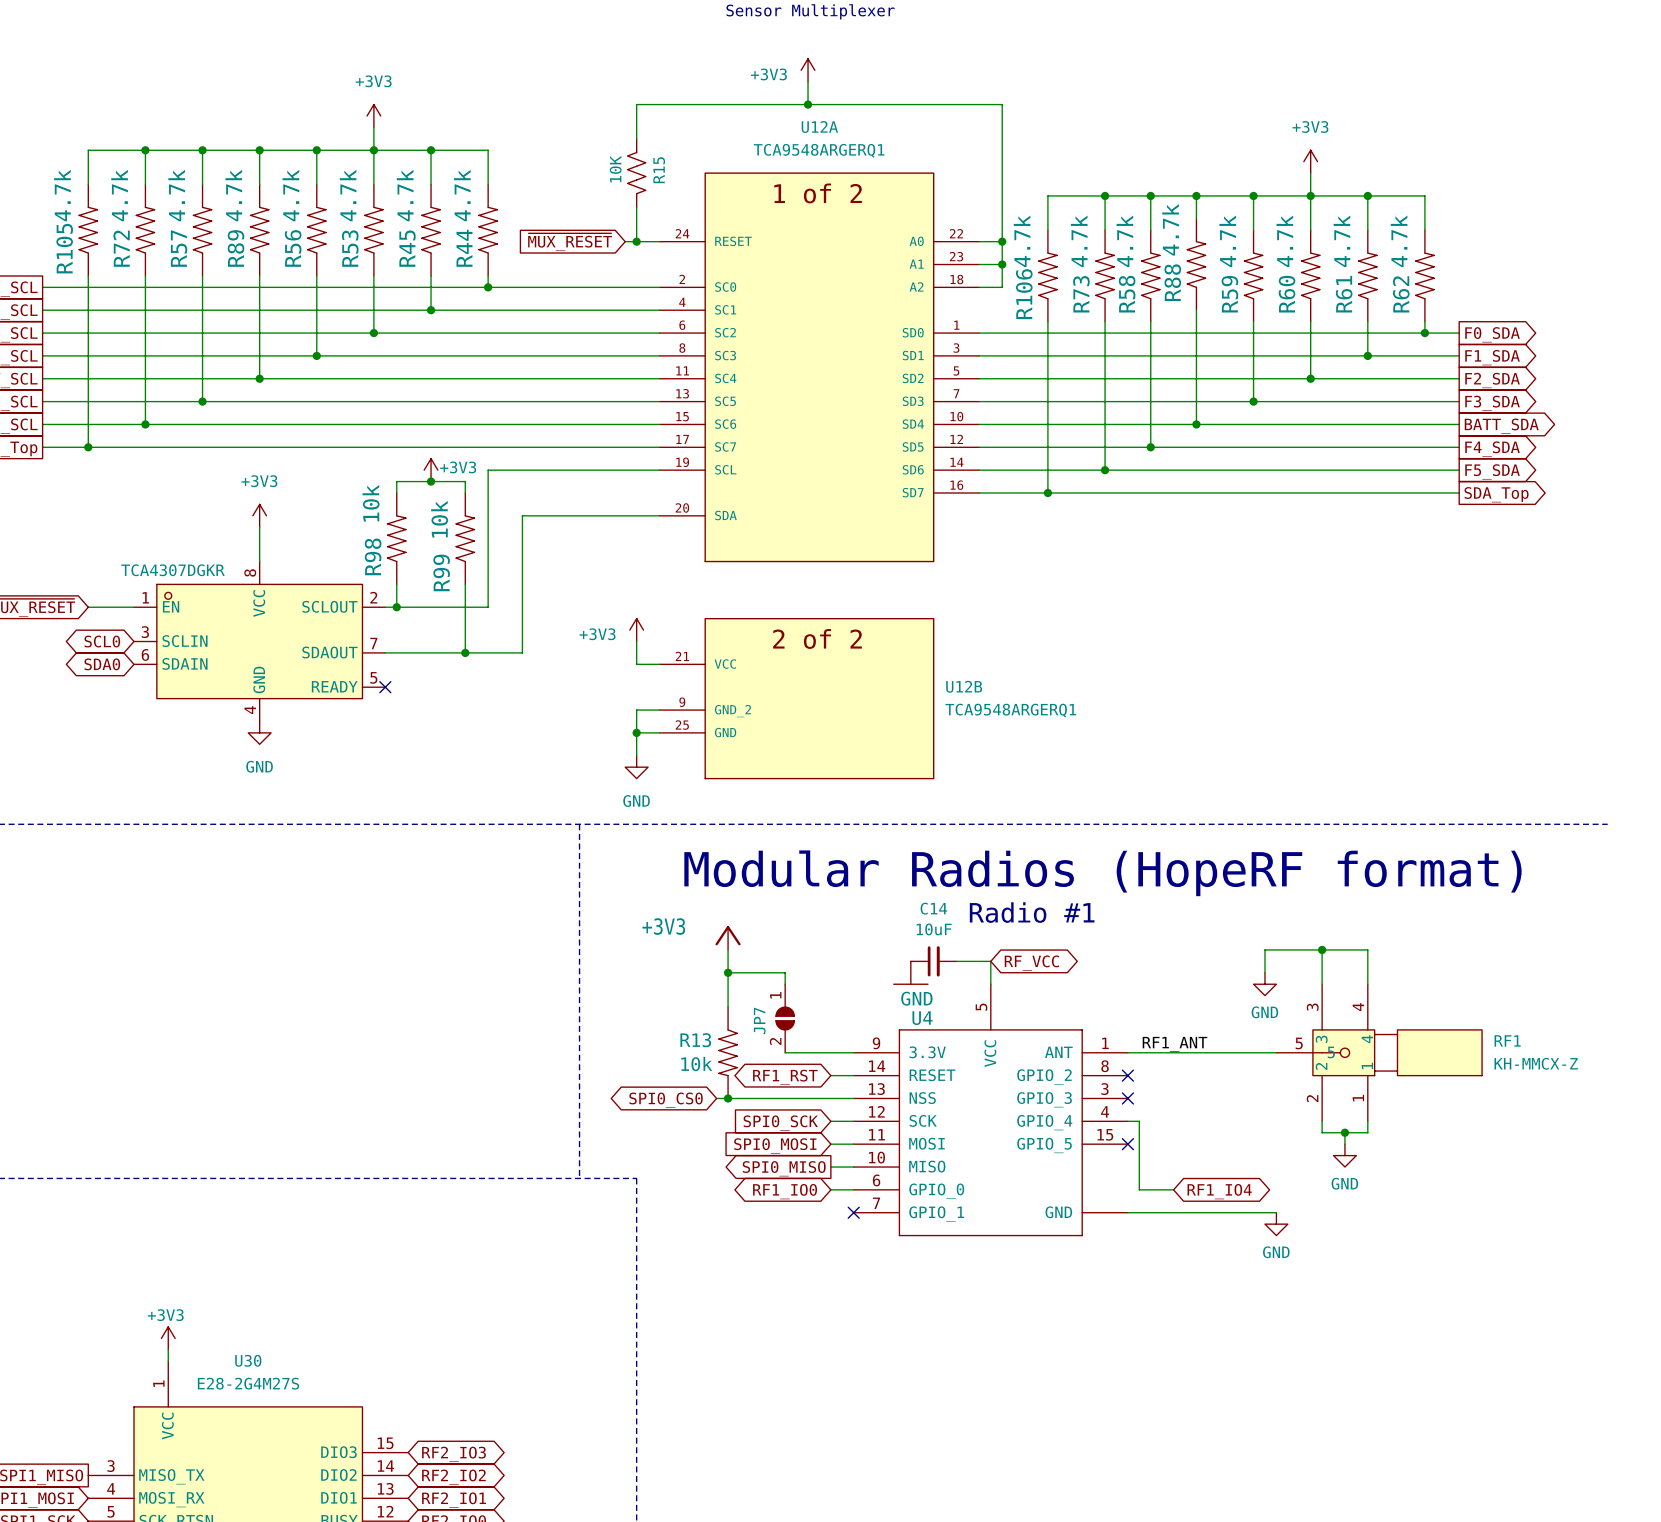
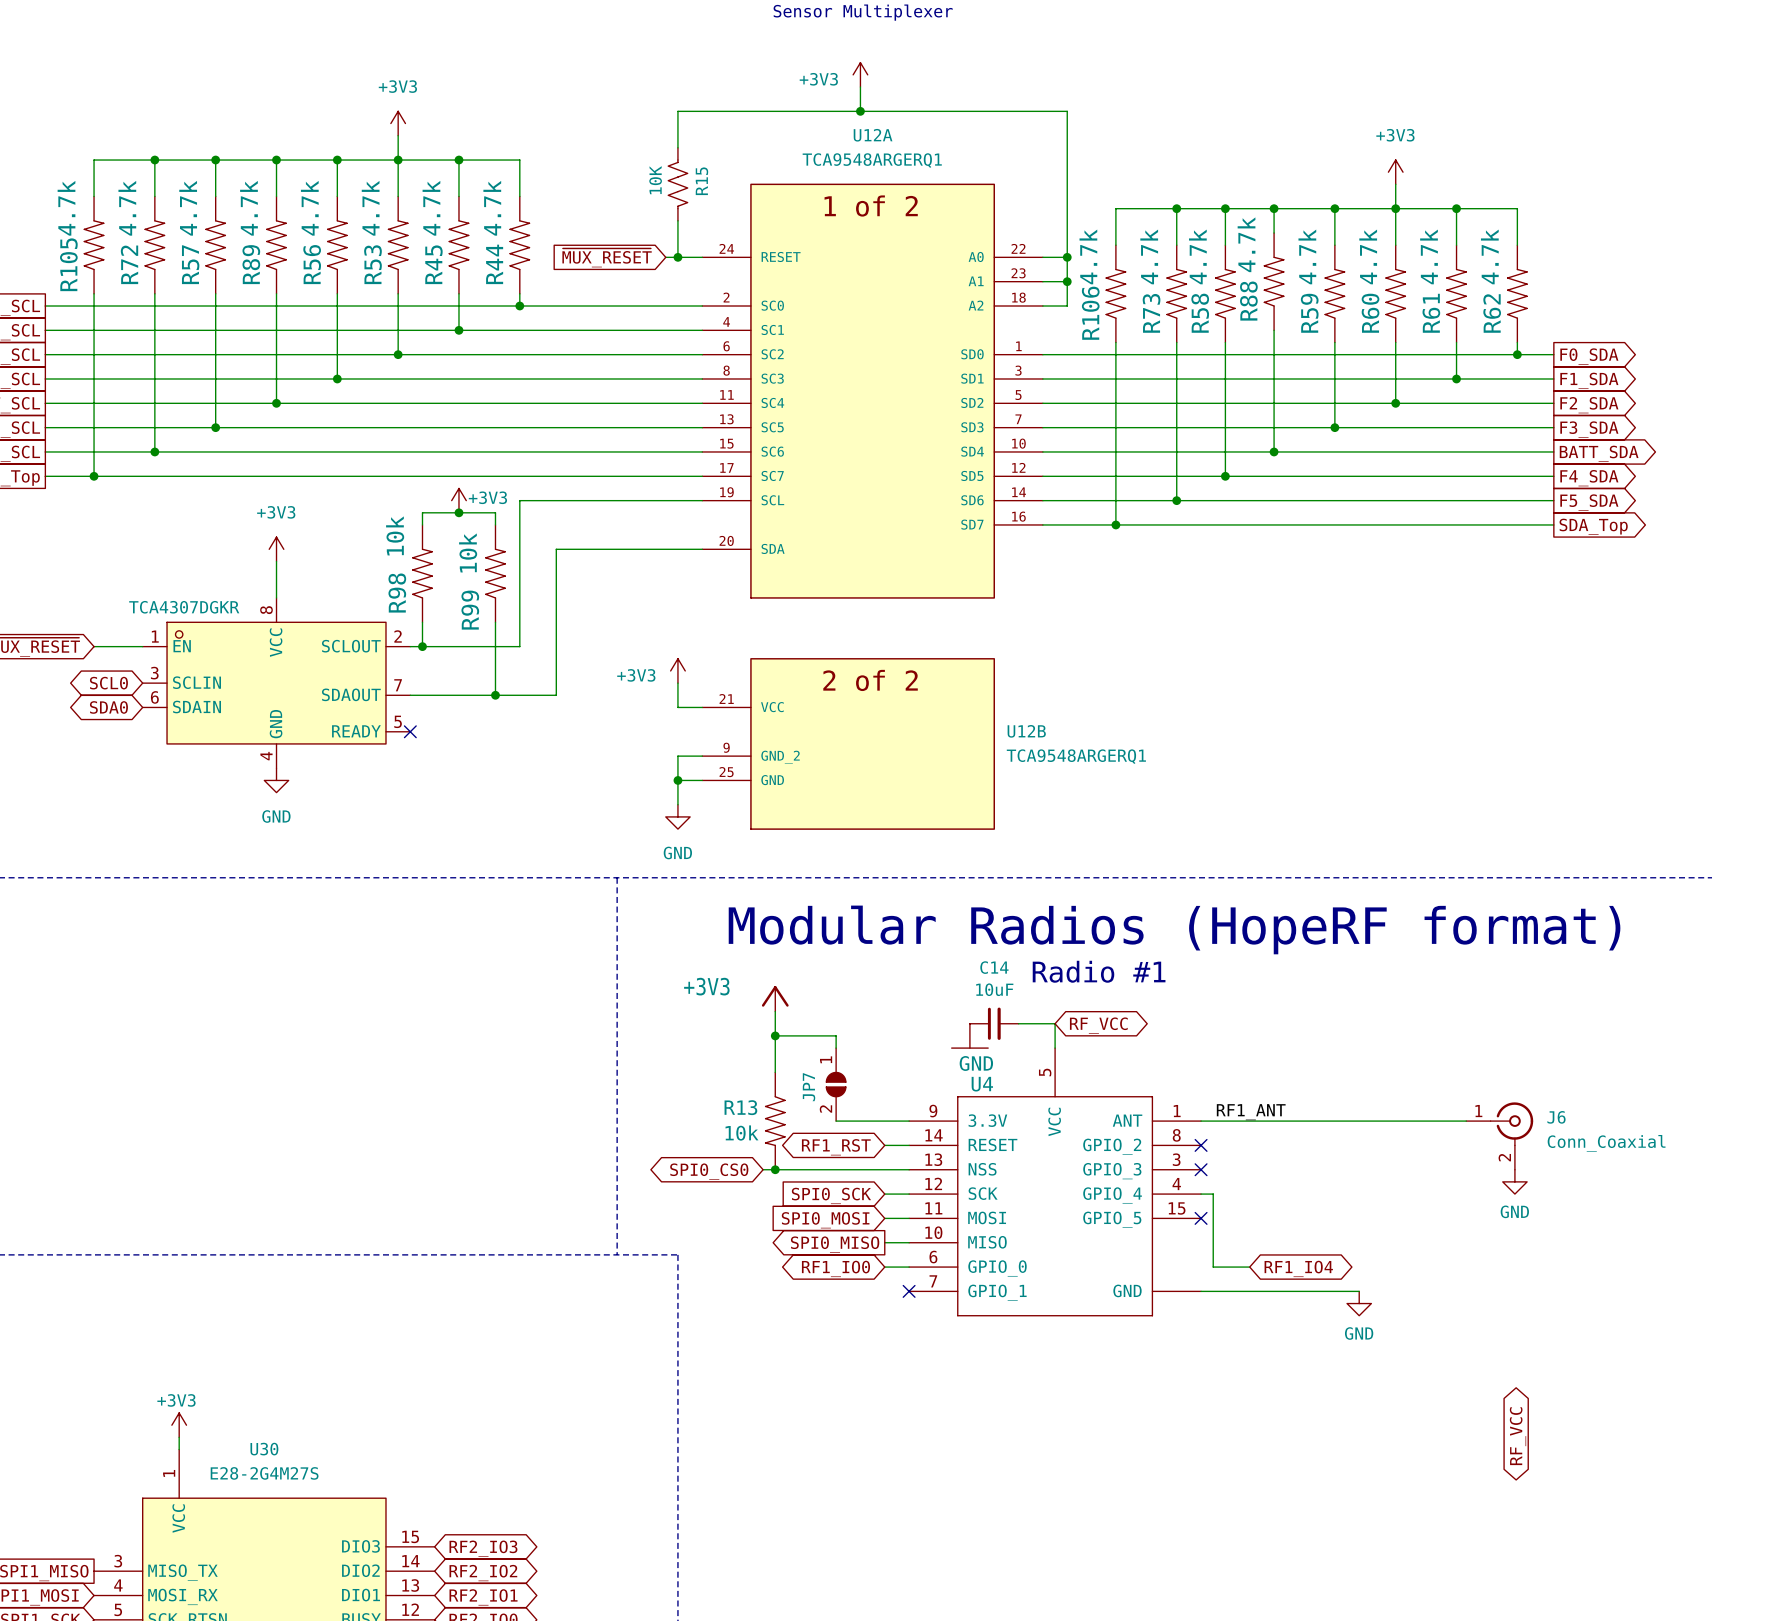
wire: (1322, 949) (1322, 984) -> none
junction: (1322, 949) -> none
wire: (1264, 972) (1264, 949) (1367, 949) (1367, 984) -> none
power symbol: GND (1264, 984) -> none
RF1: KH-MMCX-Z (1379, 1052) -> none
J6: none -> Conn_Coaxial (1499, 1136)
wire: (1322, 1121) (1322, 1132) (1367, 1132) (1367, 1121) -> none
wire: (1344, 1132) (1344, 1144) -> none
junction: (1344, 1132) -> none
power symbol position: GND (1344, 1155) -> GND (1514, 1181)
global label: none -> RF_VCC (1518, 1436)

